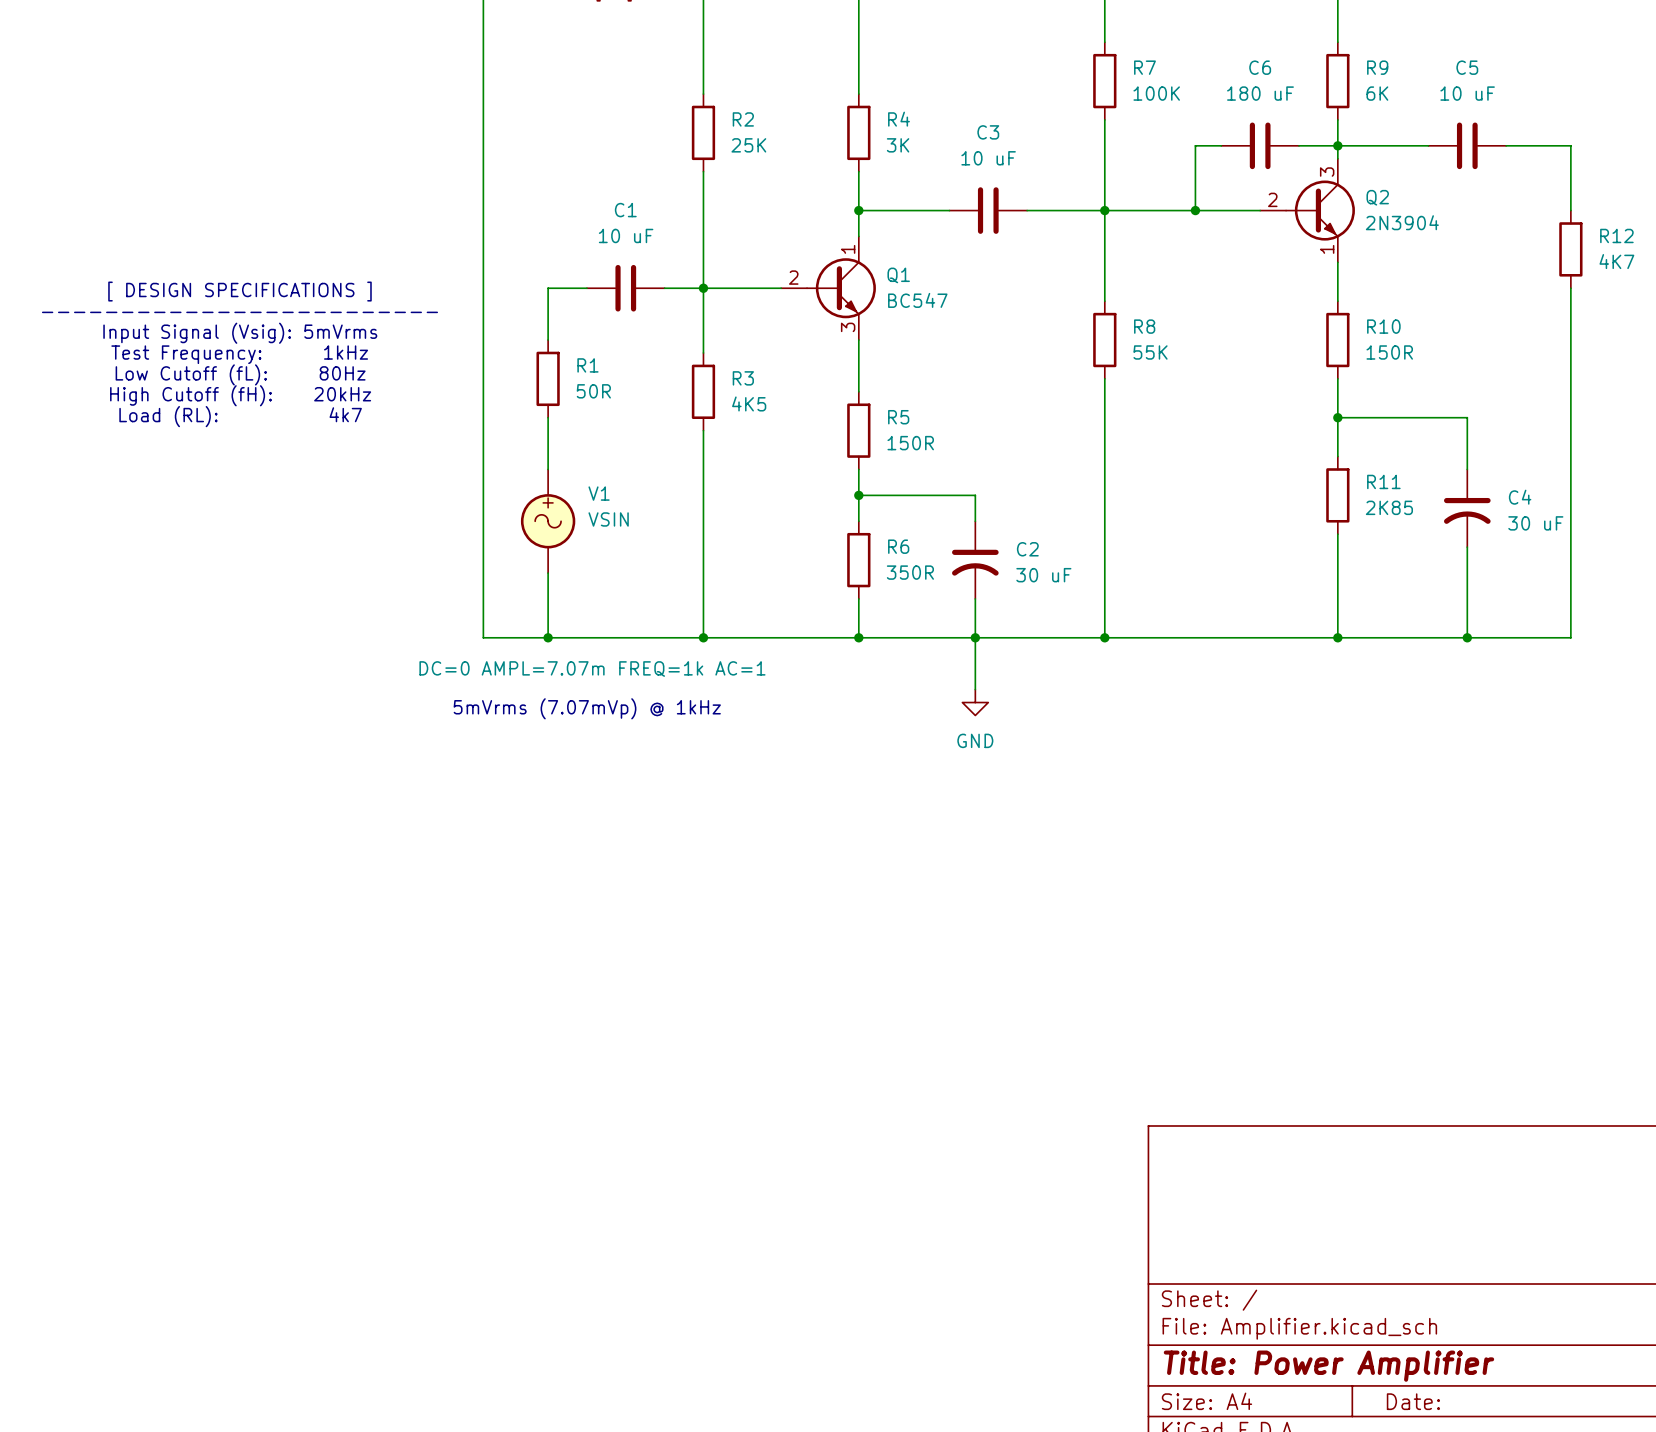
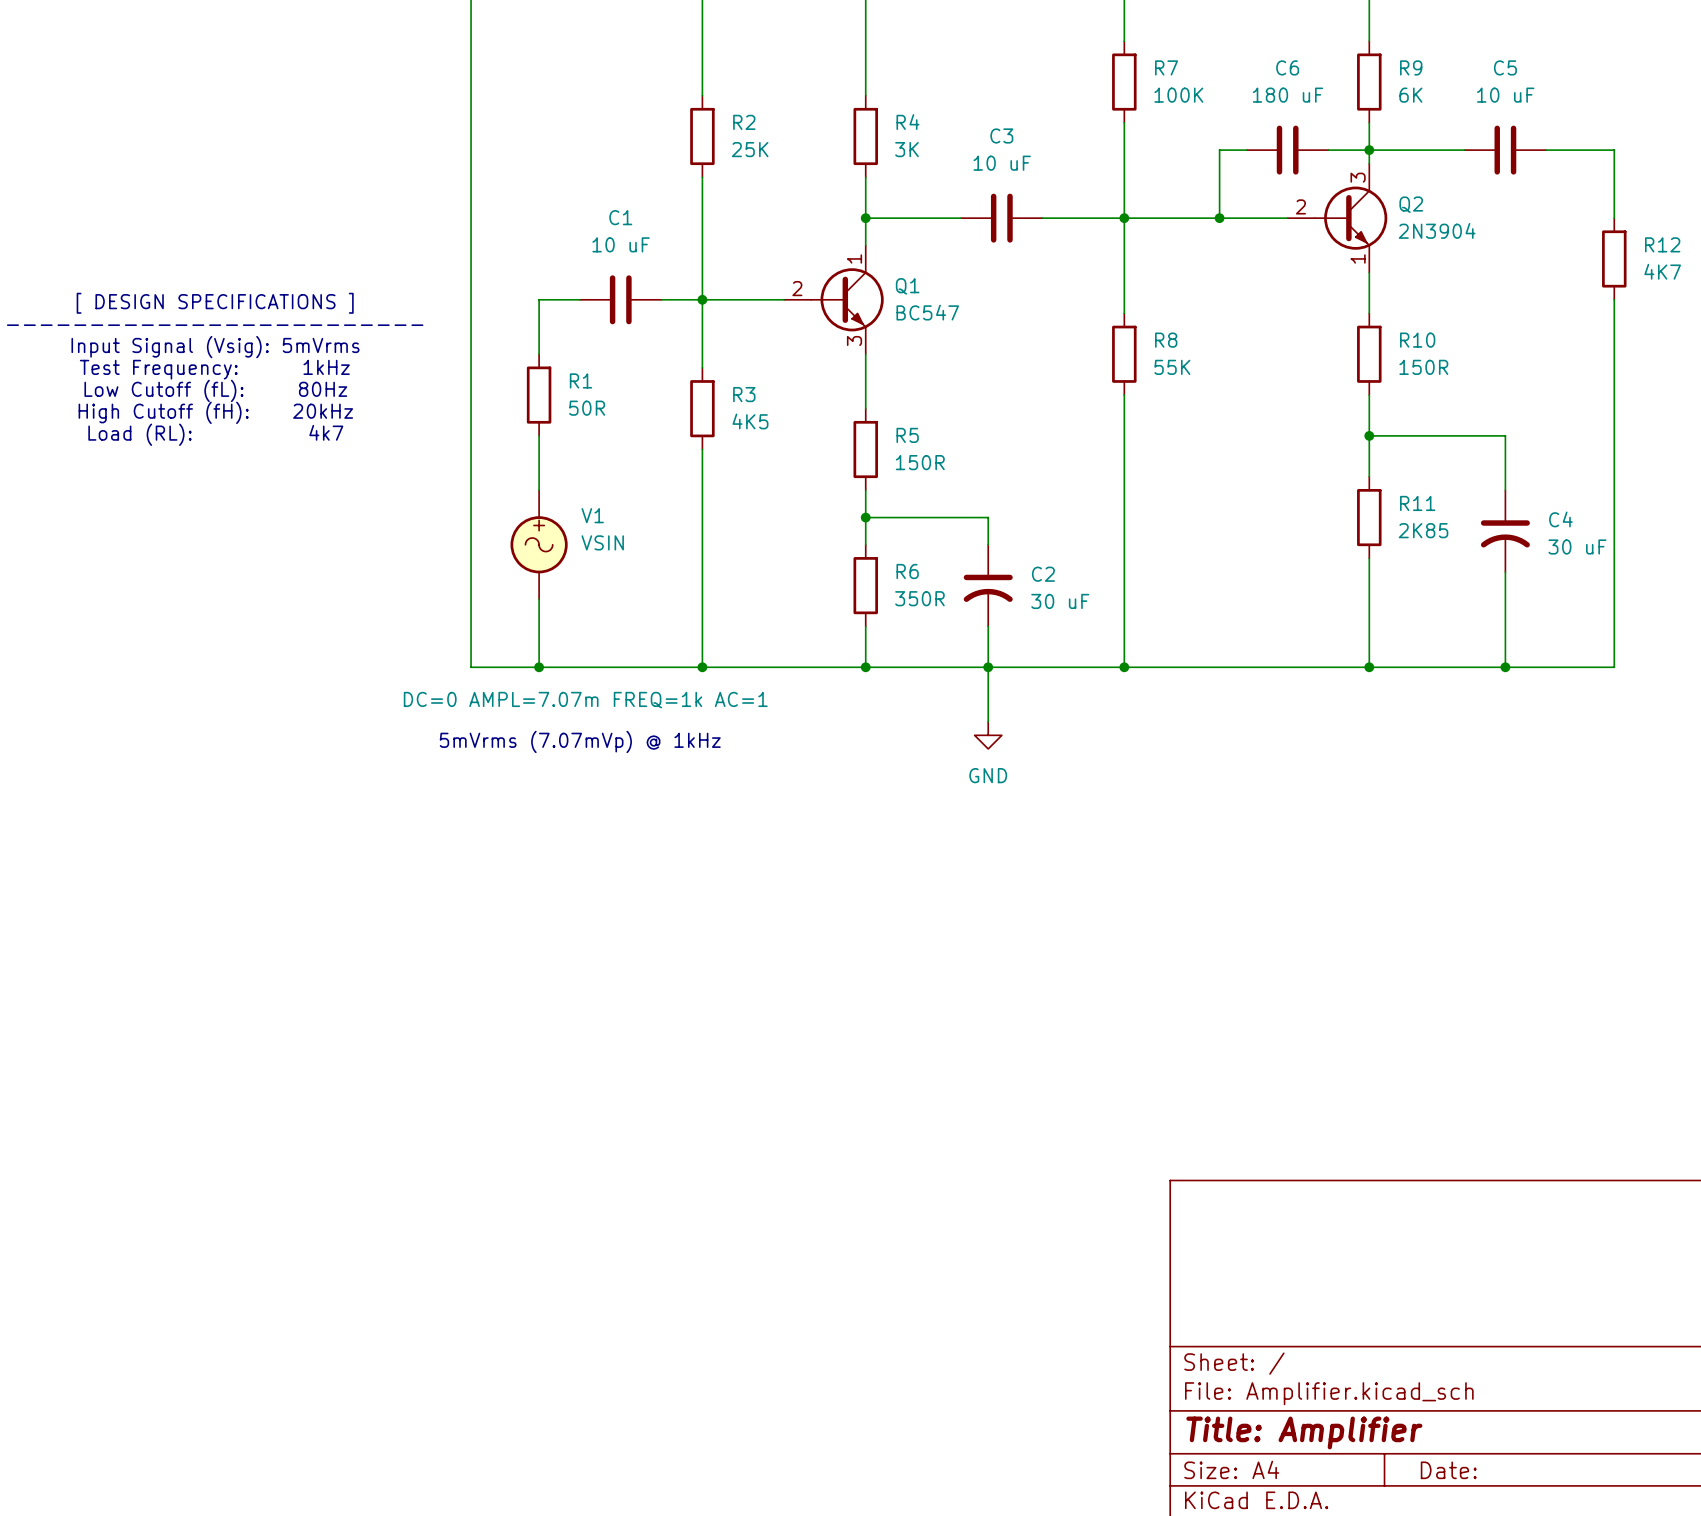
title block: Title: Power Amplifier (1328, 1366) -> Title: Amplifier (1304, 1432)

